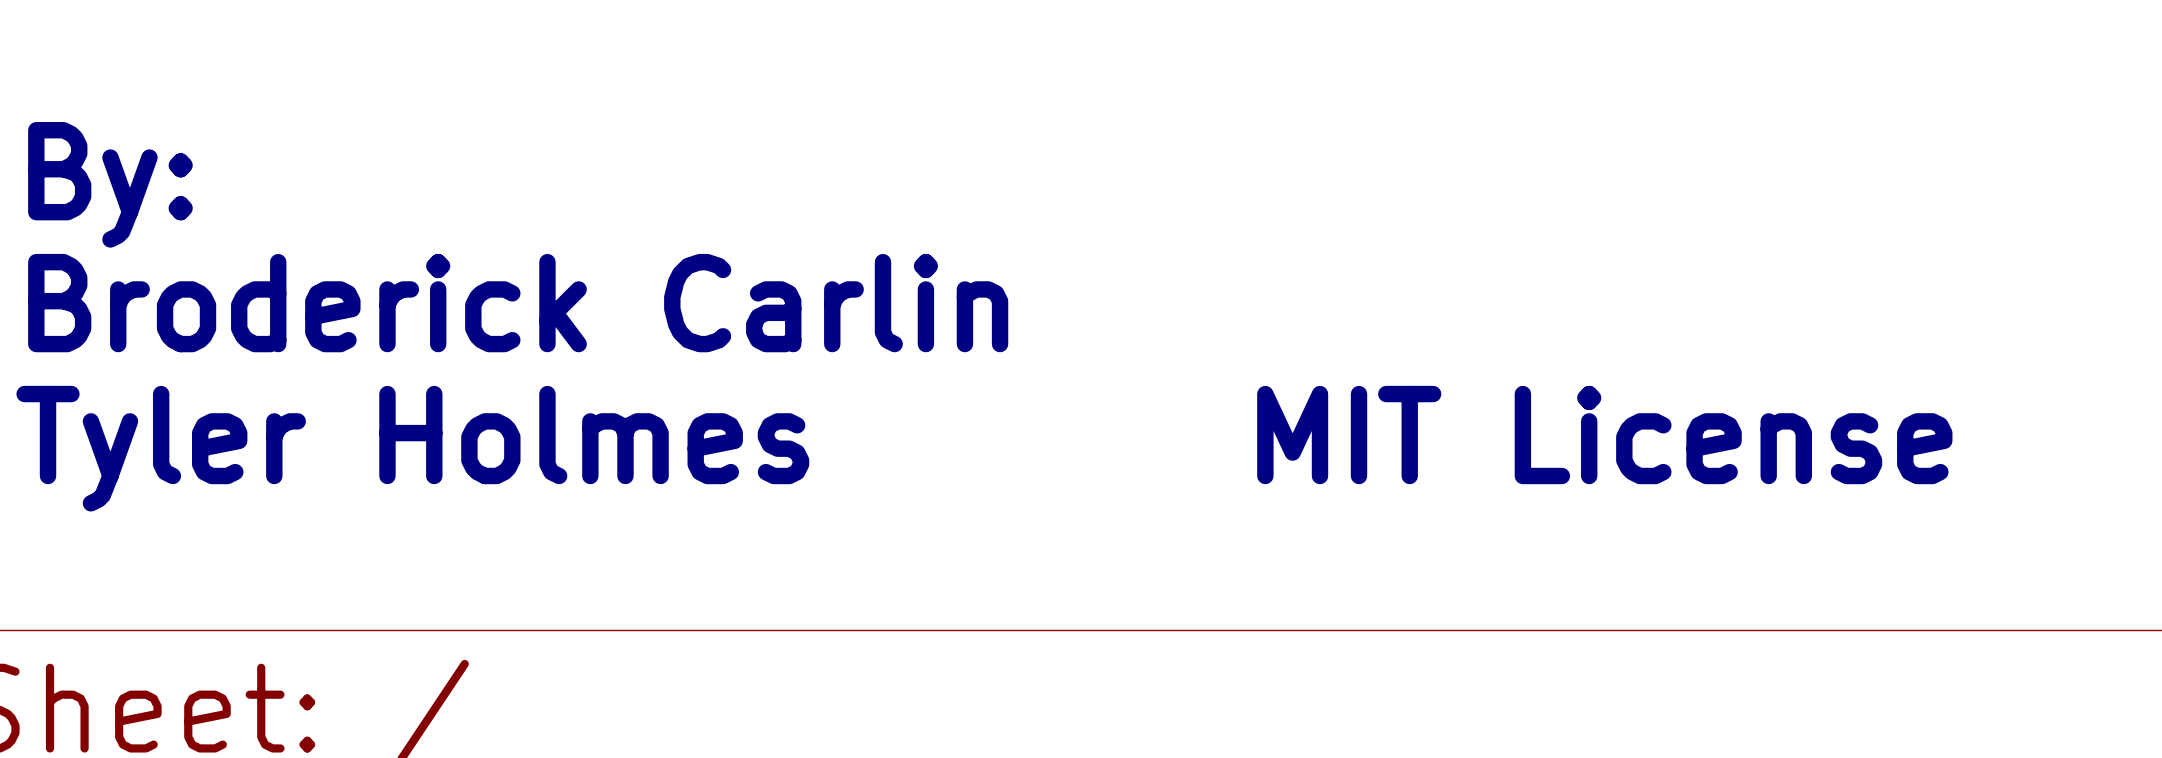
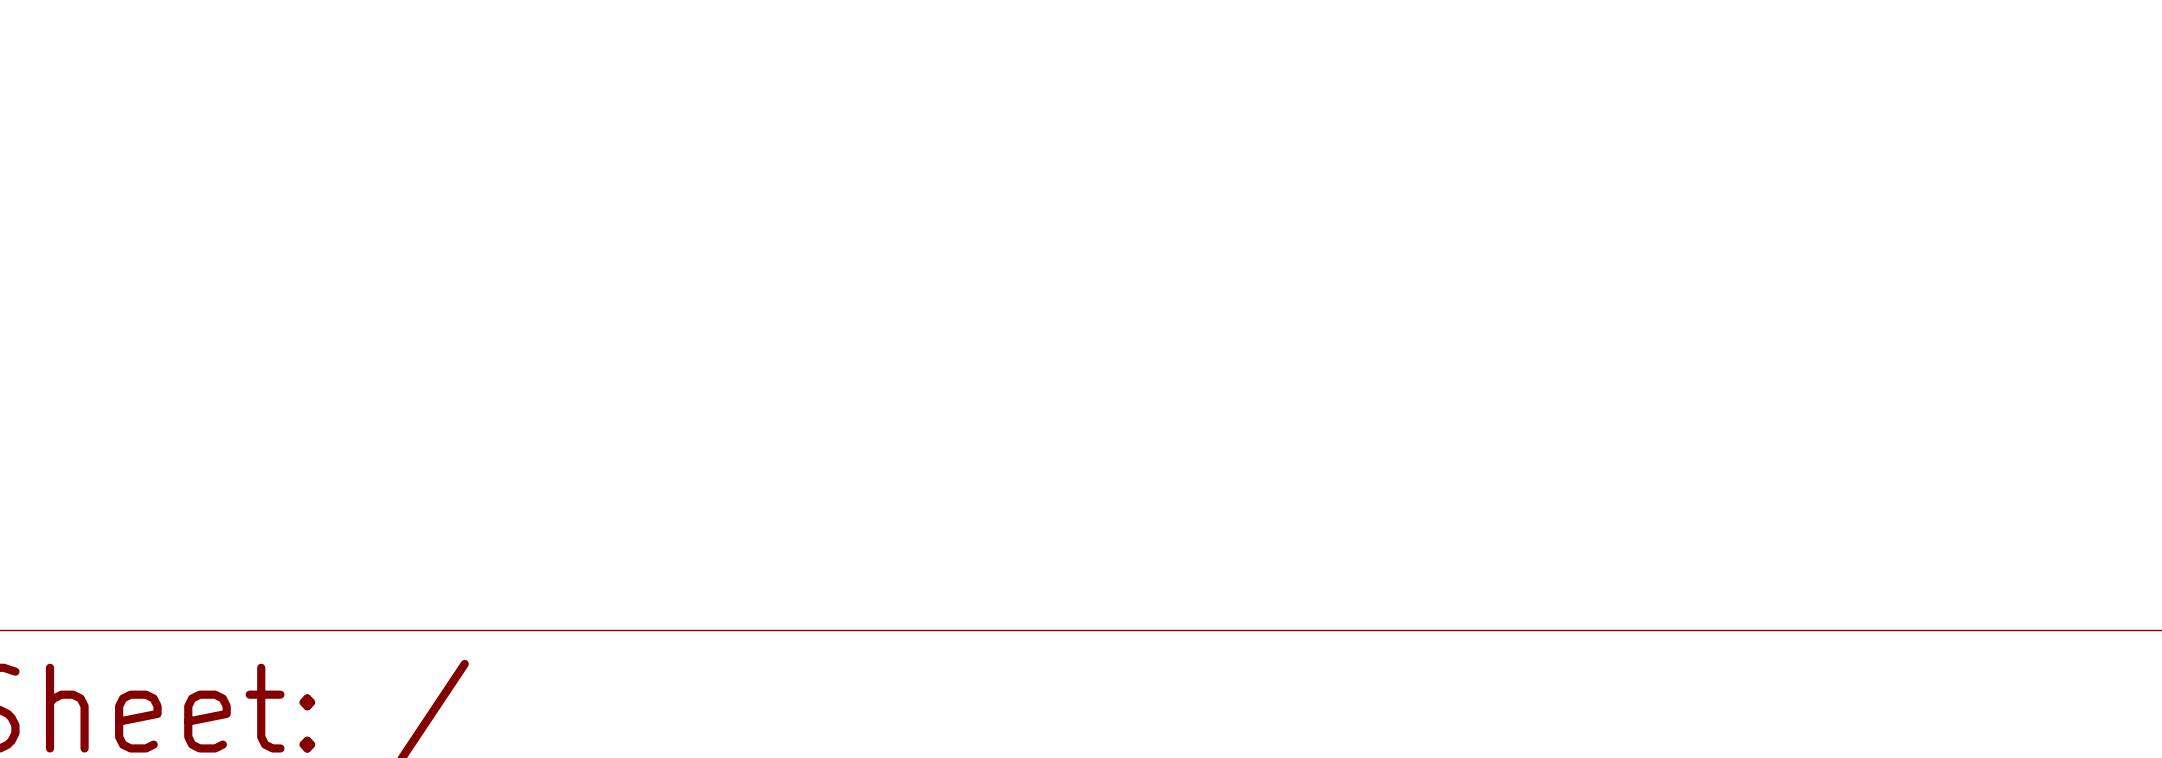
text: By: (110, 184) -> none
text: Broderick Carlin (518, 303) -> none
text: MIT License (1604, 435) -> none
text: Tyler Holmes (412, 448) -> none

